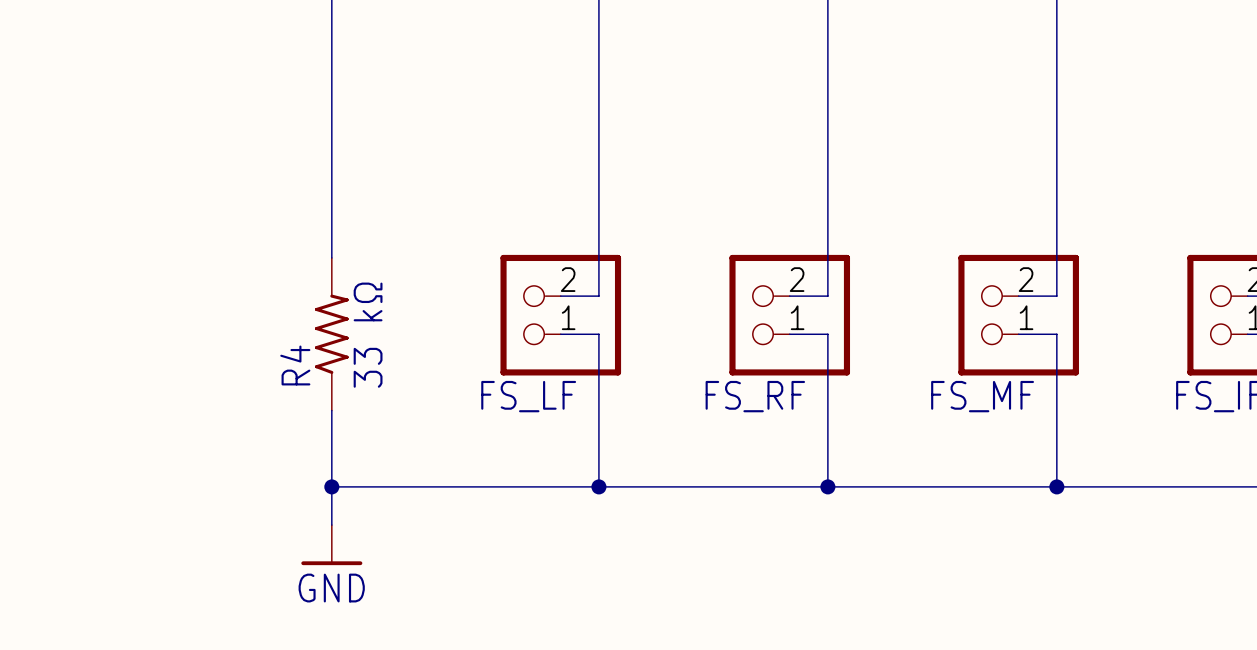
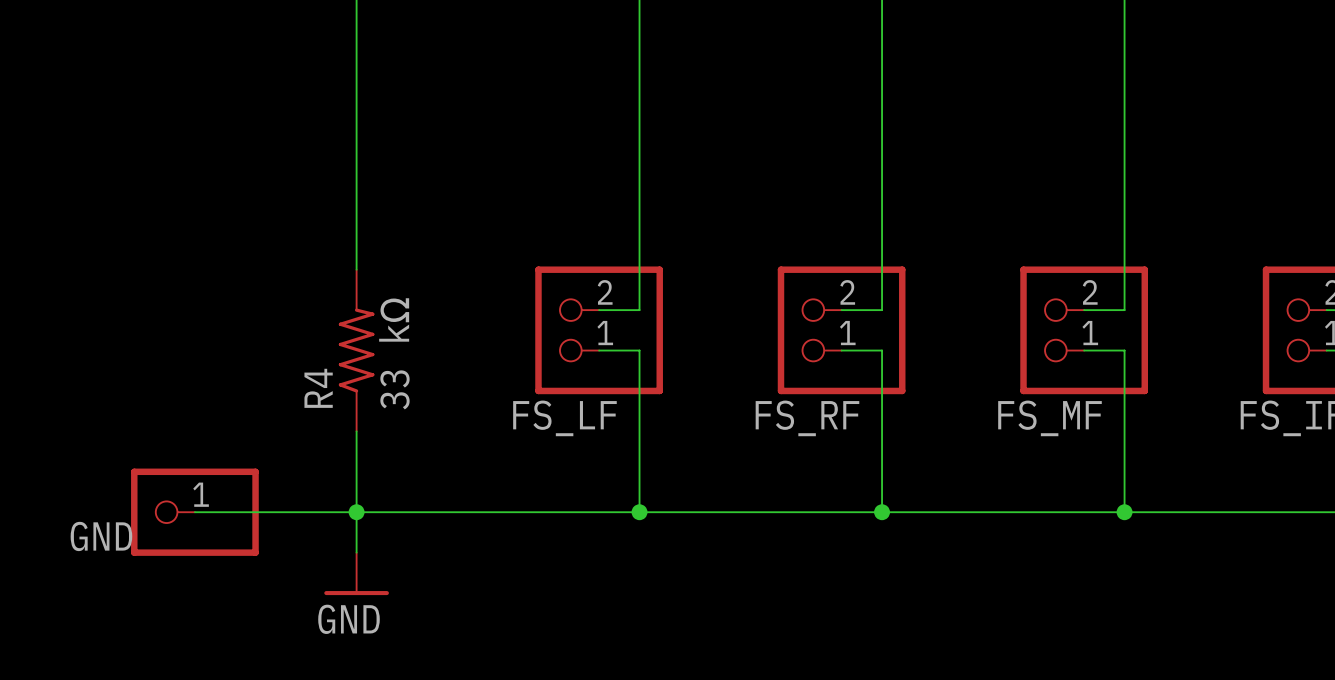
wire: none -> (194, 512) (356, 512)
GND: none -> (194, 512)

